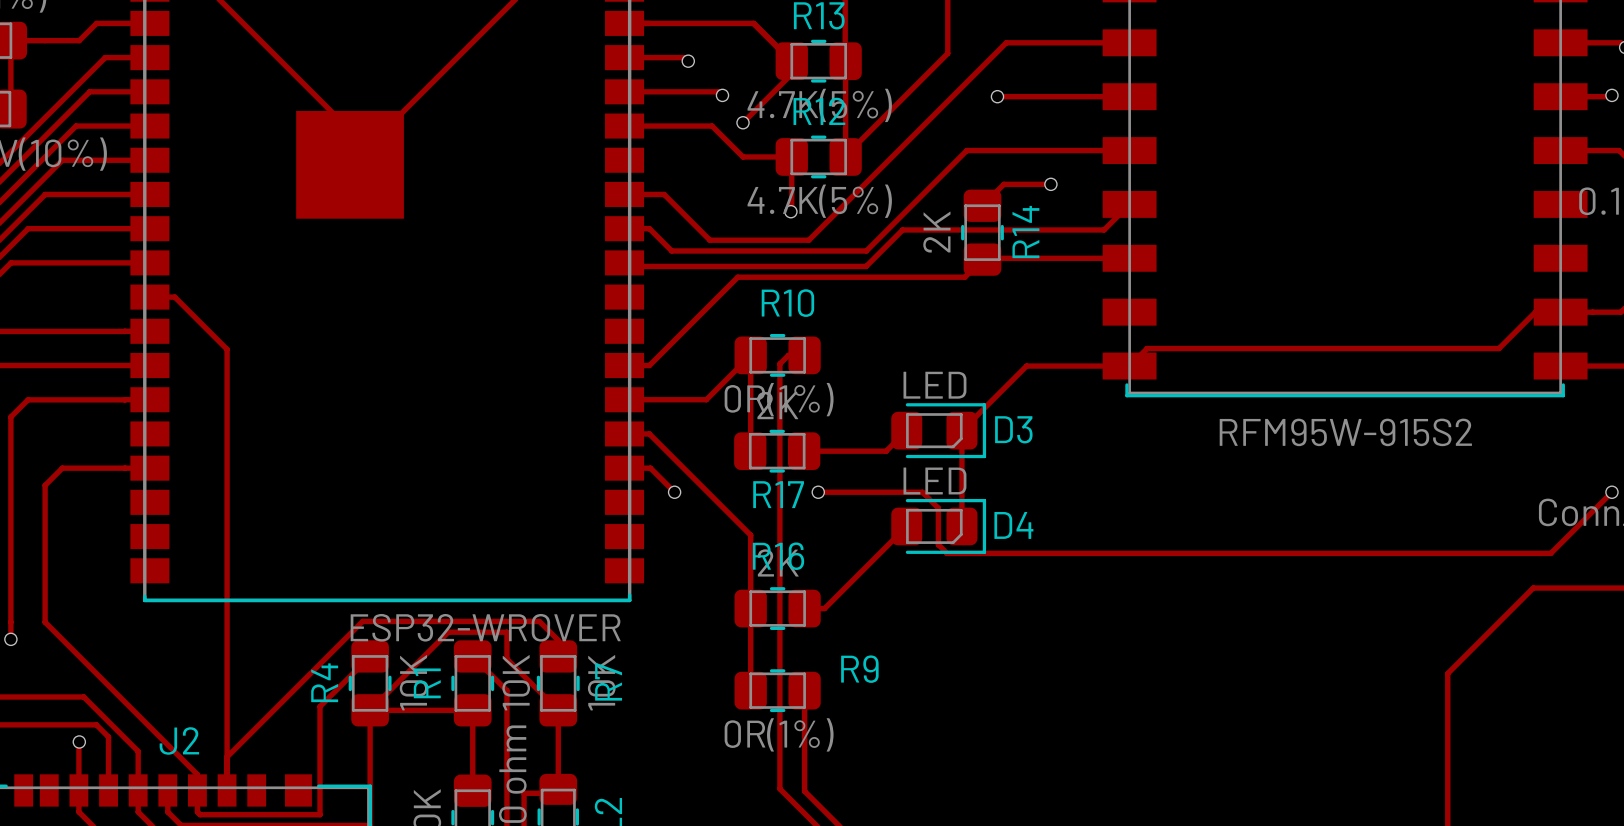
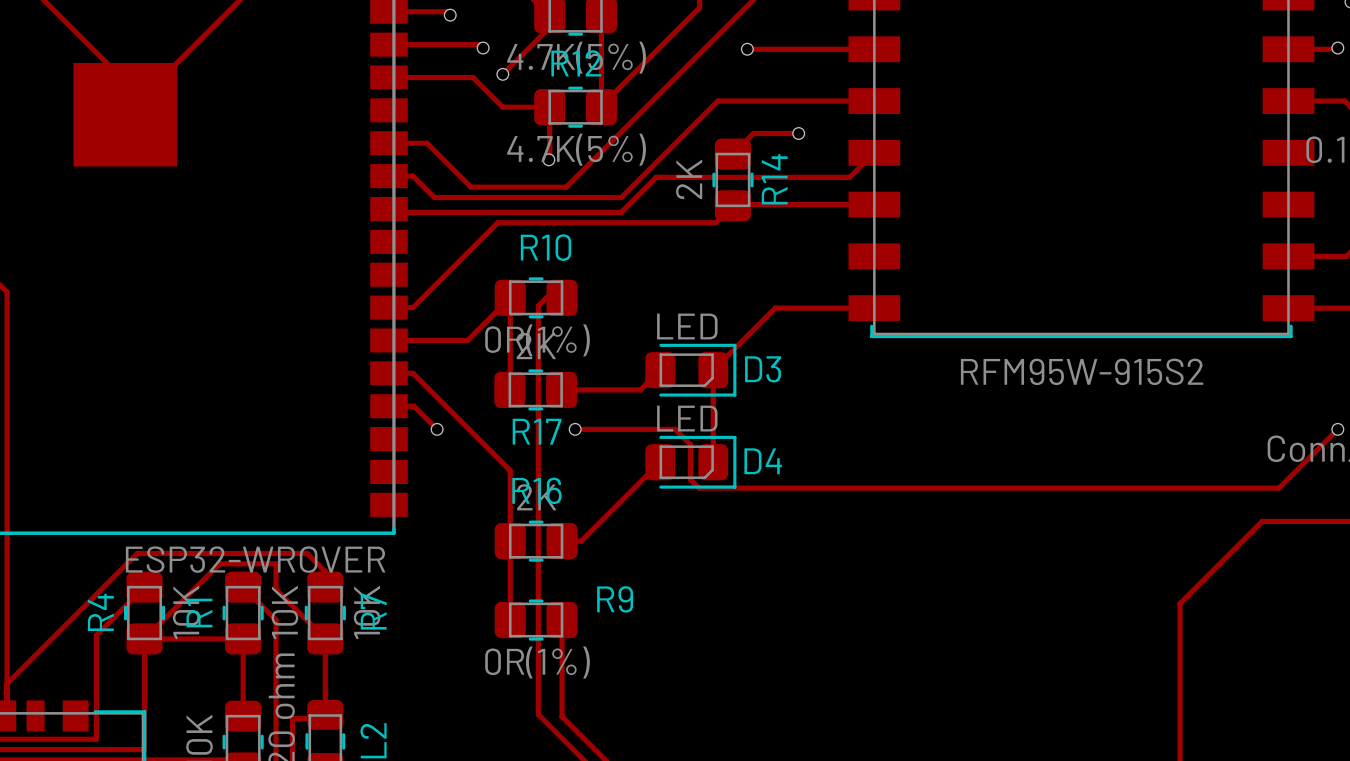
track: (1560, 312) (1535, 312) (1499, 348) (1147, 348) (1129, 366) -> none

